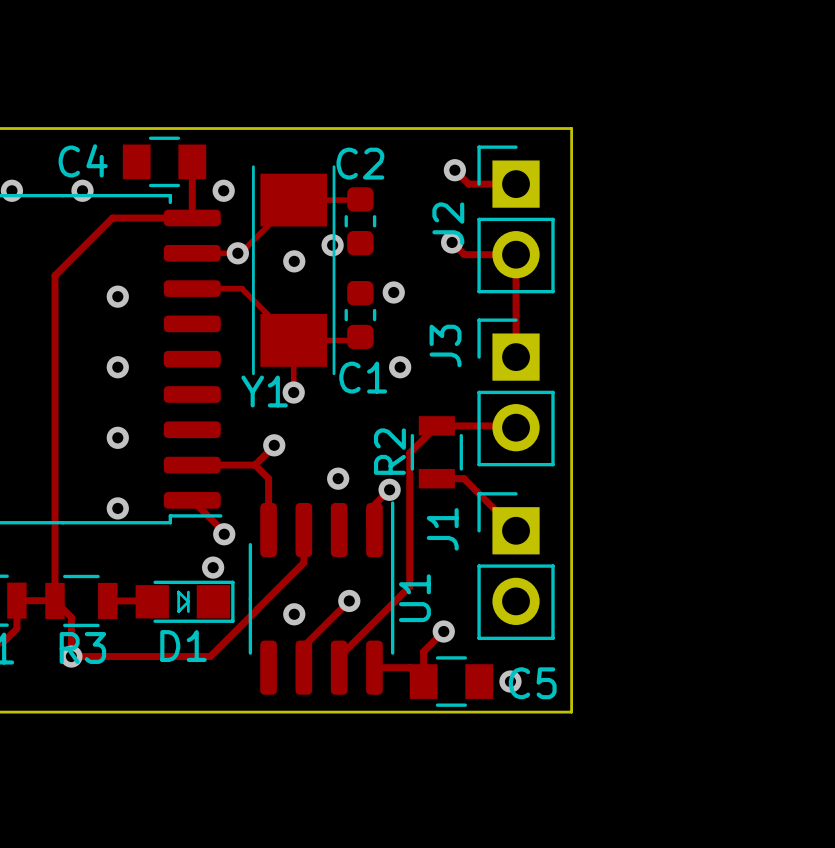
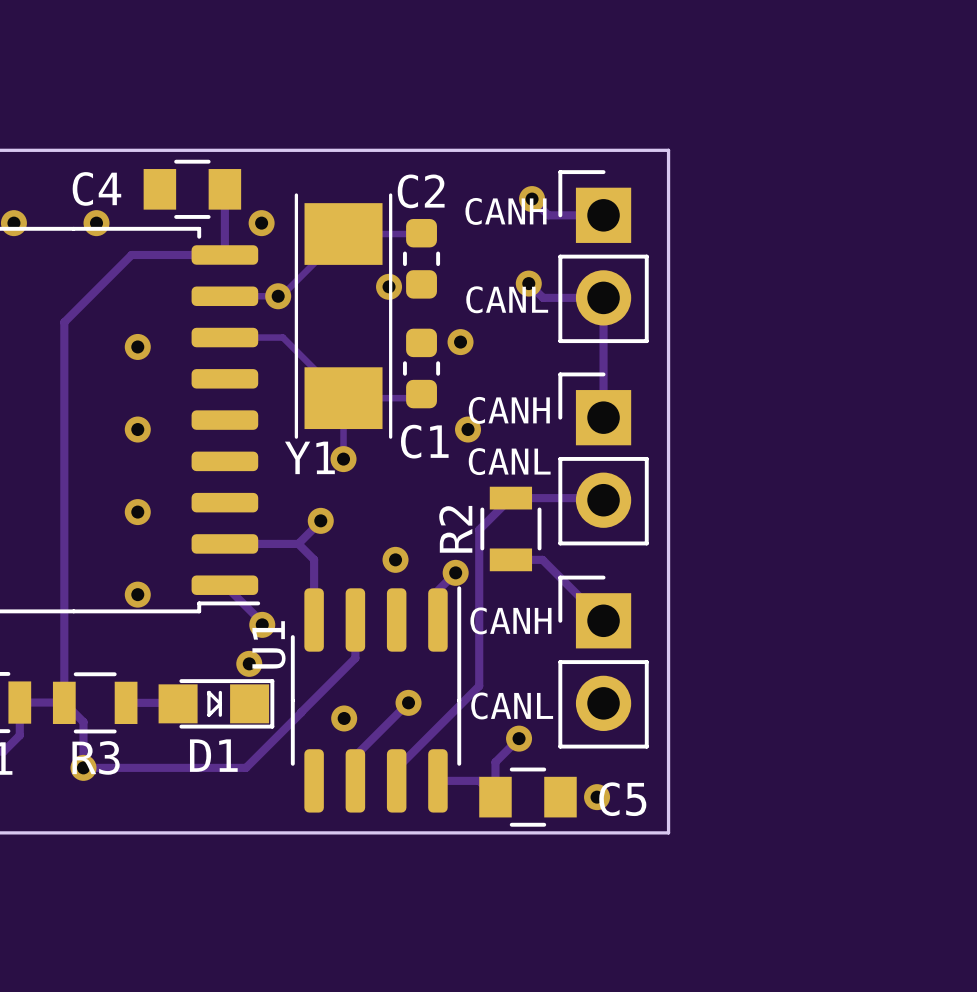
text: none -> CANH (506, 211)
J2 name: J2 (448, 223) -> none
text: none -> CANL (507, 299)
via: (294, 261) -> none
J3 name: J3 (445, 345) -> none
text: none -> CANH (509, 410)
text: none -> CANL (509, 461)
J1 name: J1 (442, 529) -> none
text: none -> CANH (510, 620)
U1 name position: U1 (414, 598) -> U1 (268, 644)
text: none -> CANL (512, 705)

